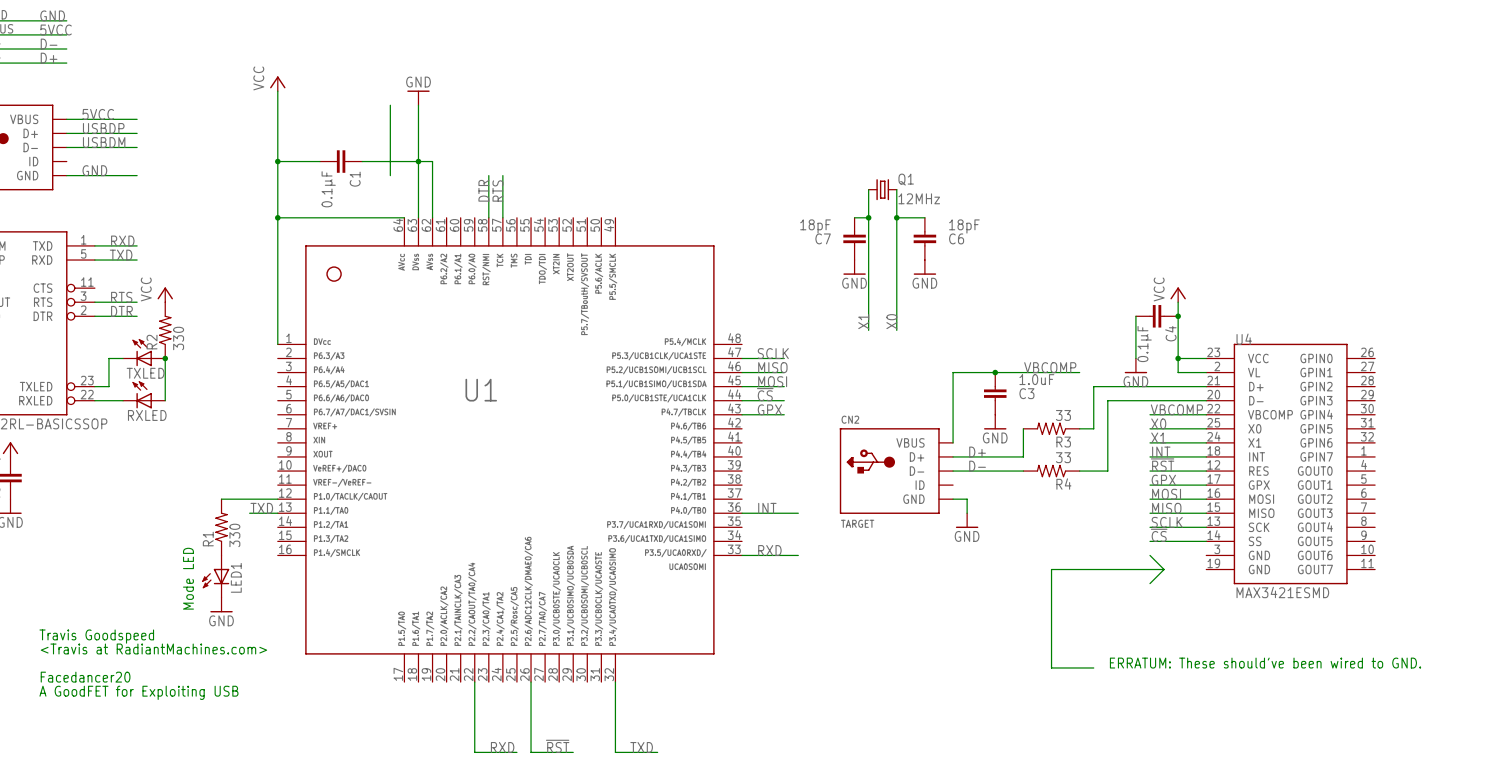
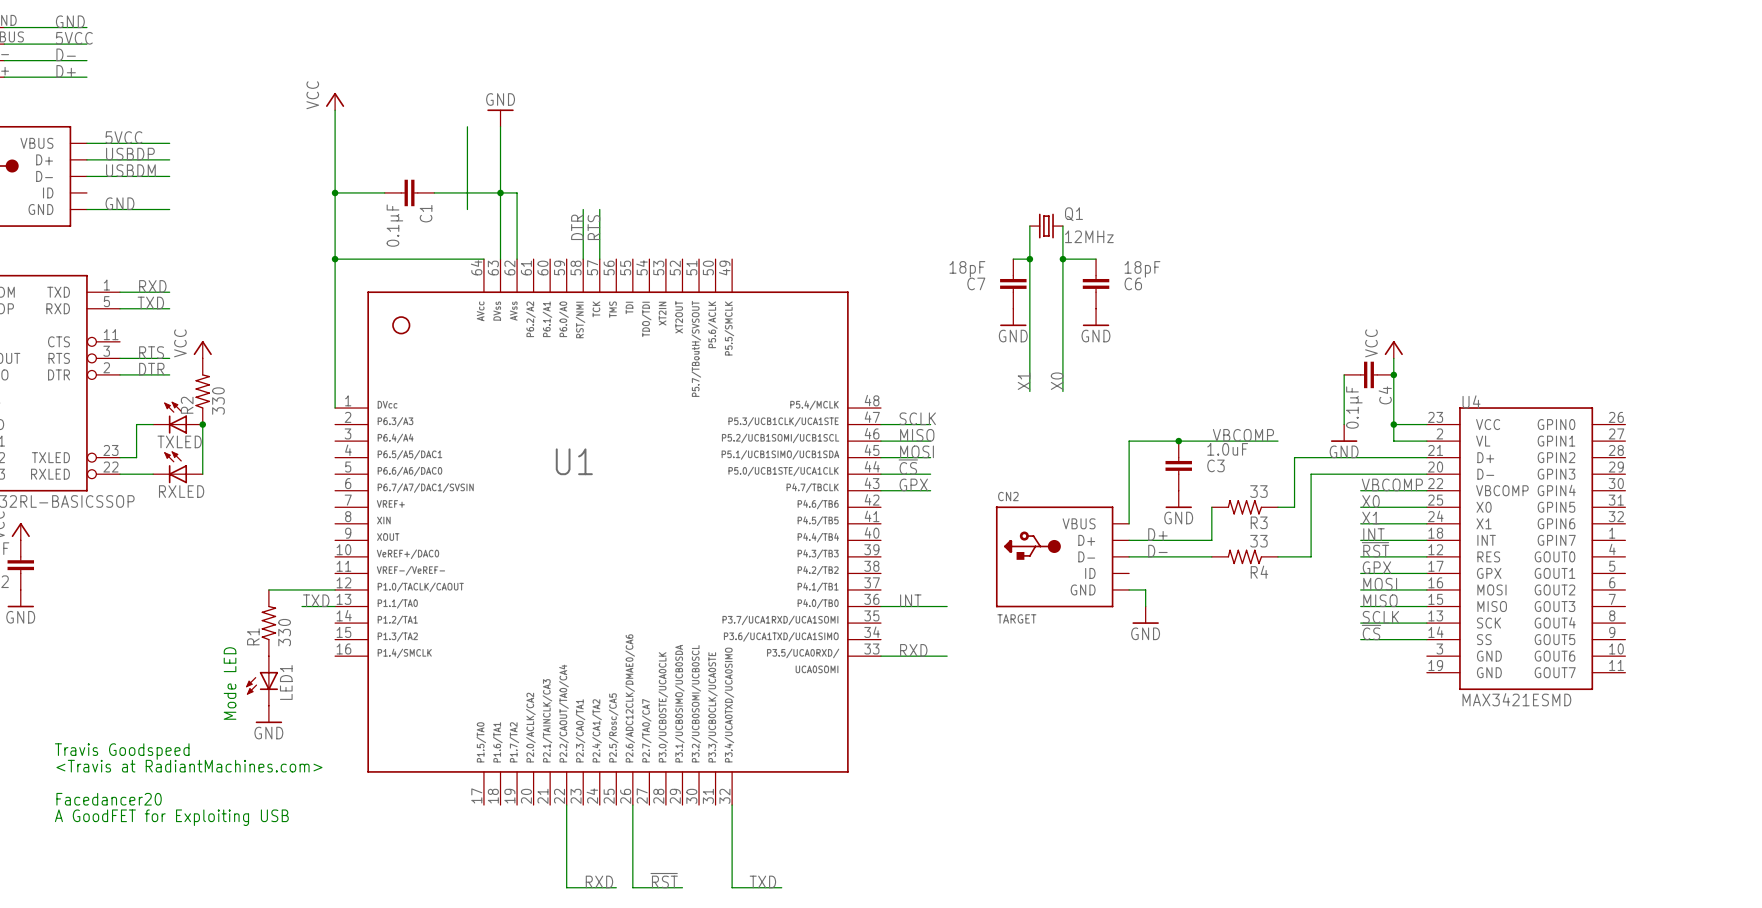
wire: (1150, 555) (1164, 569) -> none
wire: (1164, 569) (1051, 569) (1051, 667) (1093, 667) -> none
wire: (1164, 569) (1150, 583) -> none
text: ERRATUM: These should've been wired to GND. (1265, 663) -> none

